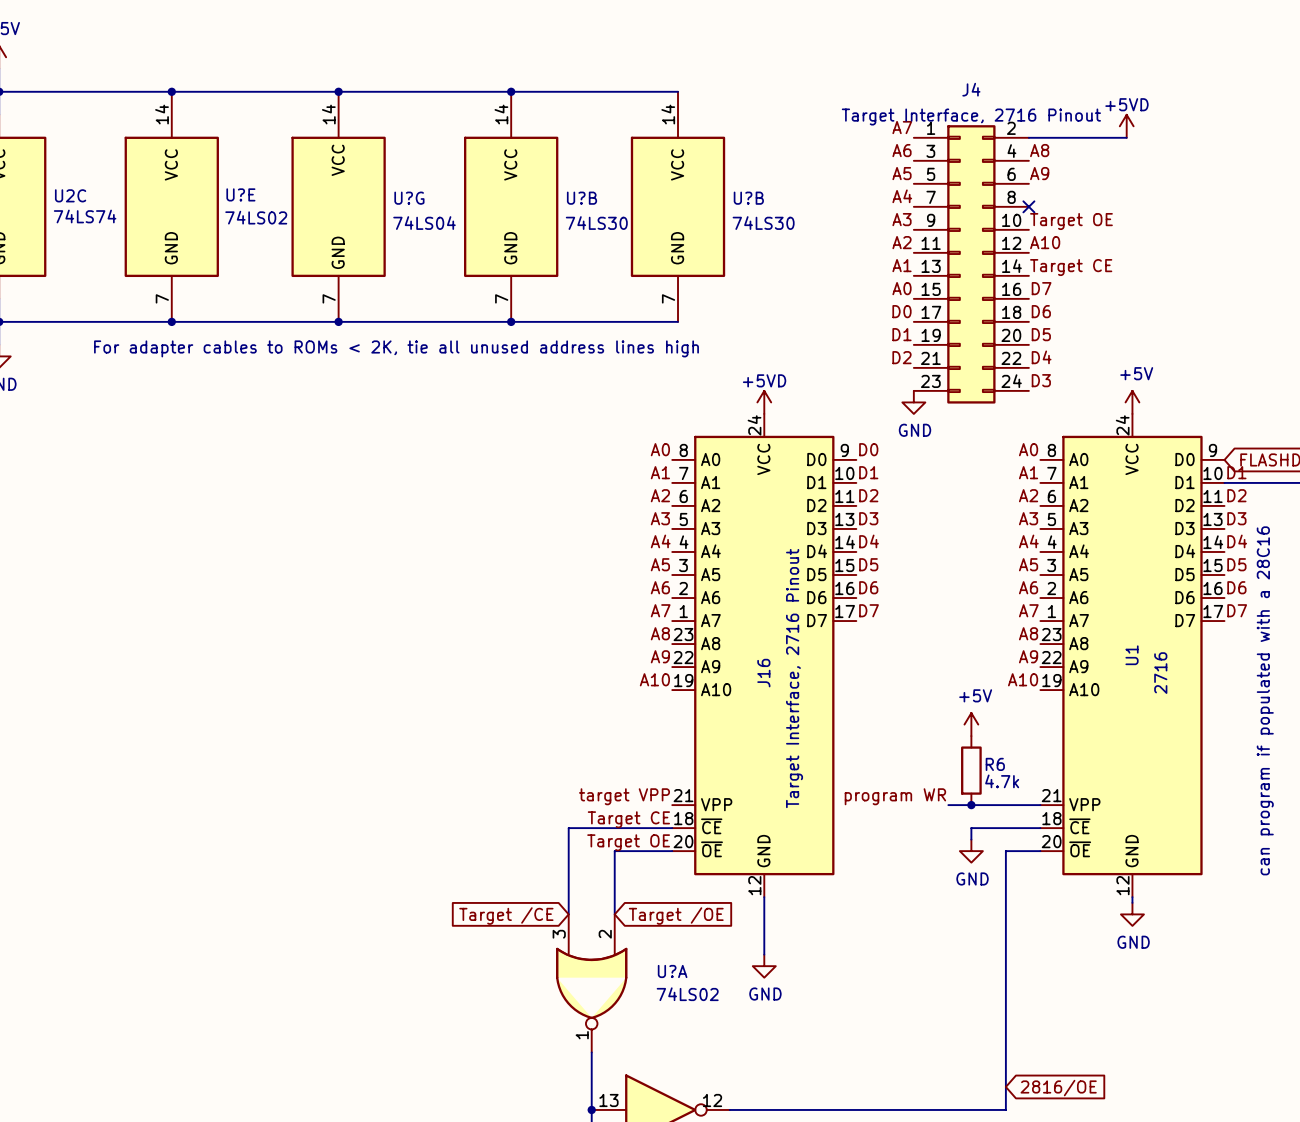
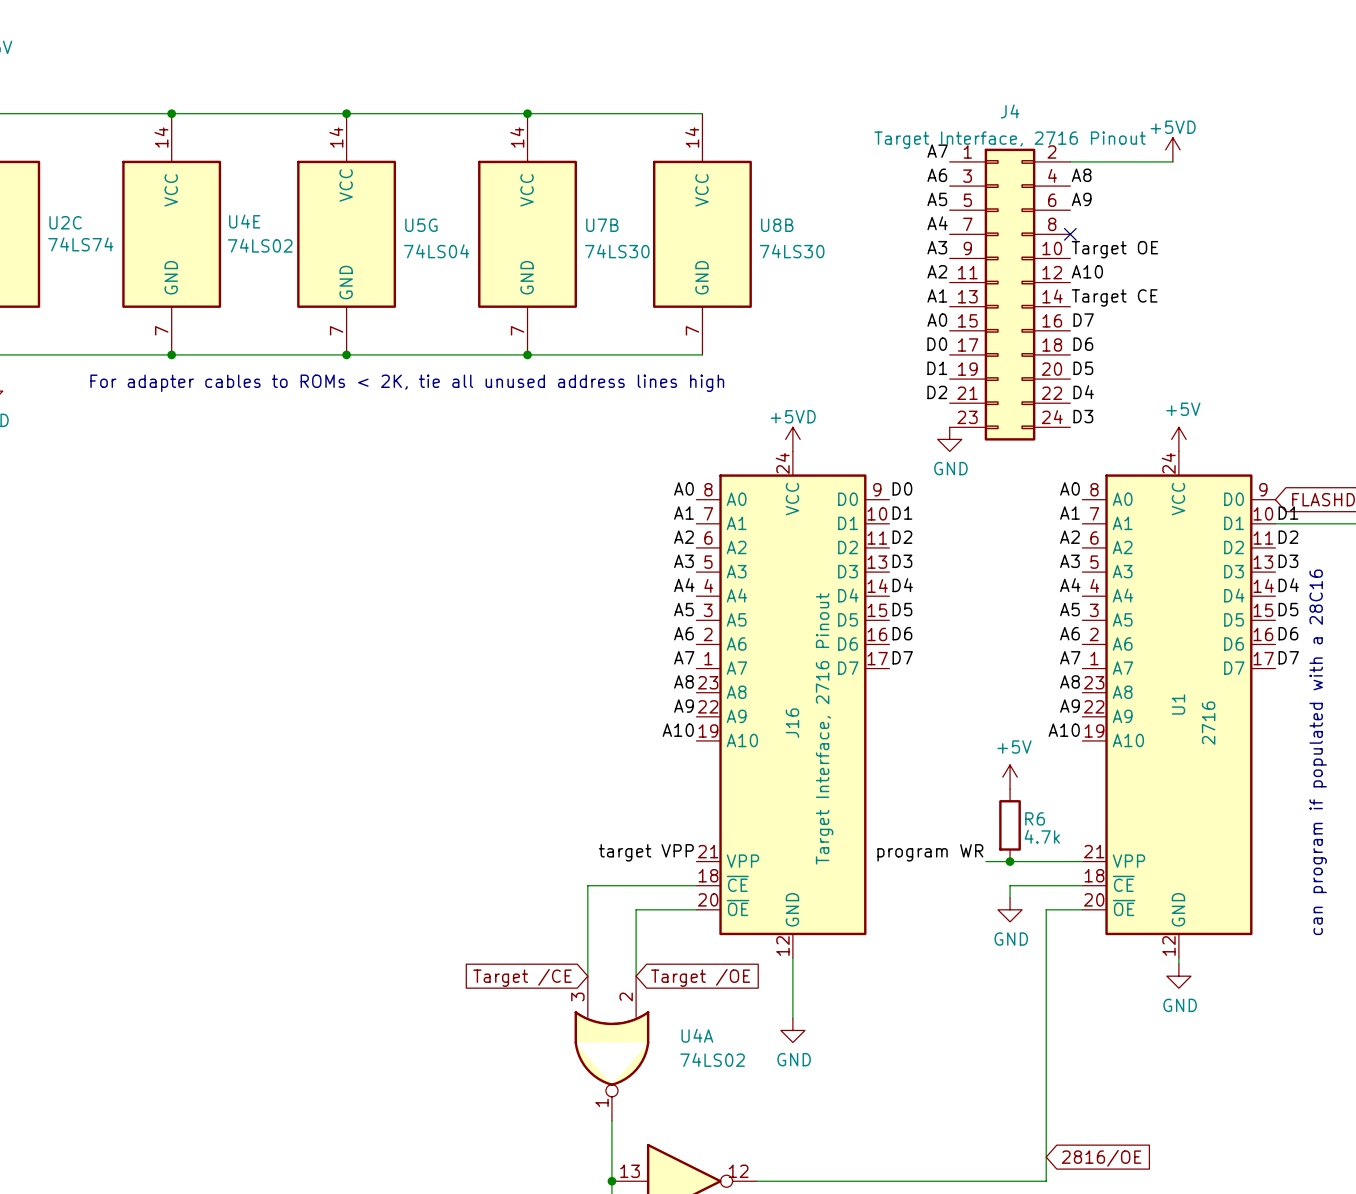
U?E name: U?E (240, 194) -> U4E (244, 221)
U?G name: U?G (409, 198) -> U5G (421, 225)
U?B name: U?B (582, 198) -> U7B (602, 225)
U?B name: U?B (748, 198) -> U8B (777, 225)
label: Target CE (628, 819) -> none
label: Target OE (628, 842) -> none
U?A name: U?A (672, 971) -> U4A (697, 1035)

